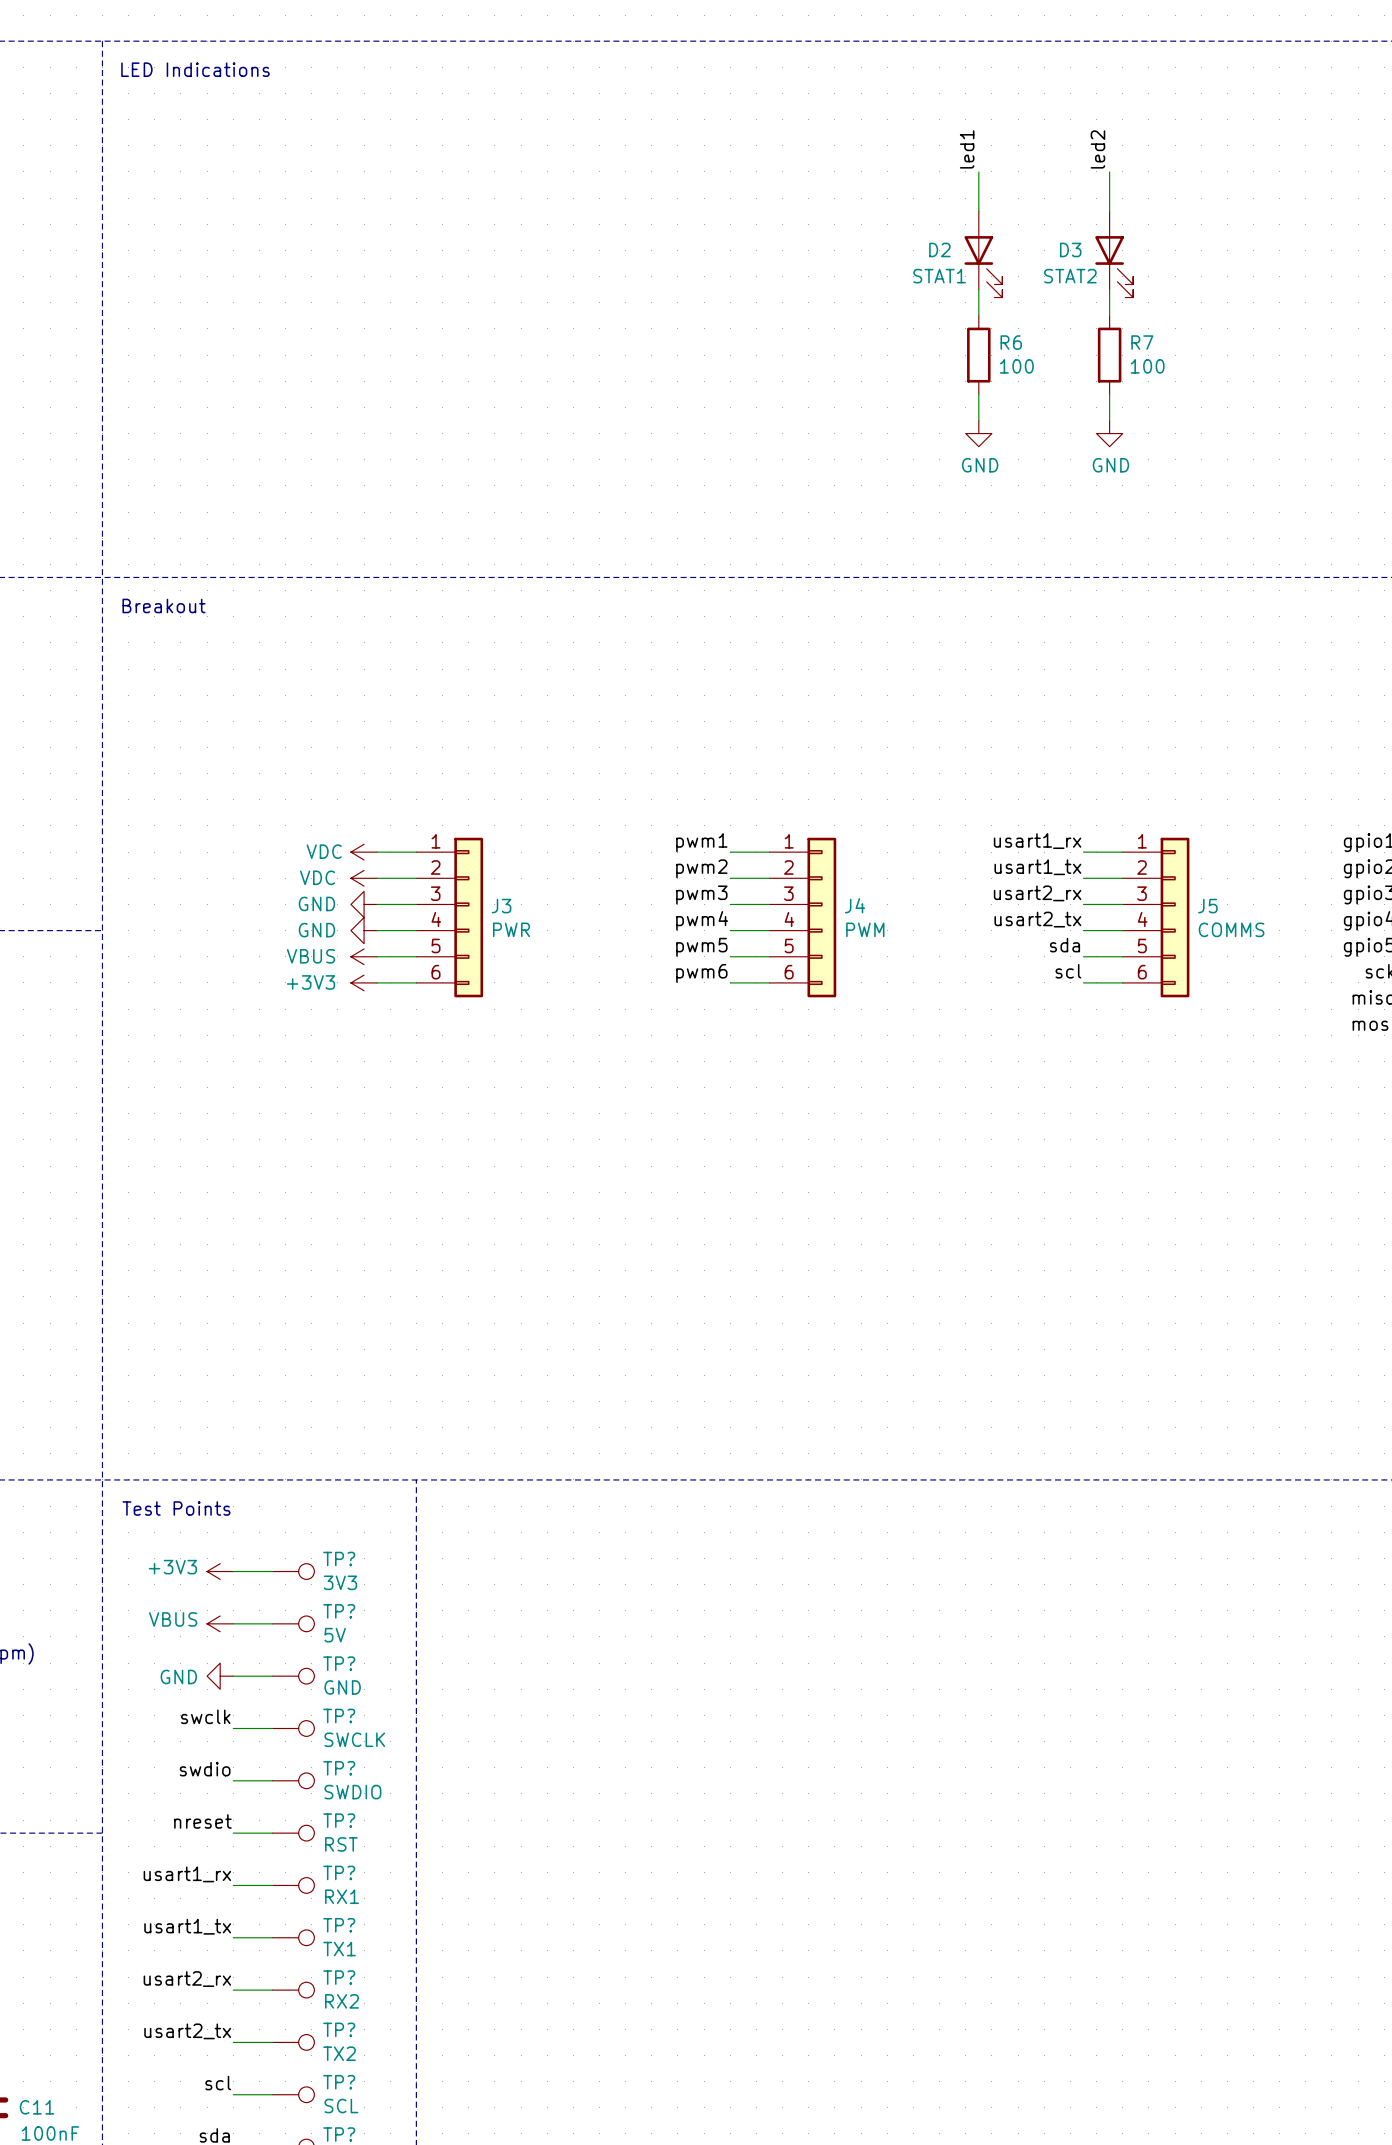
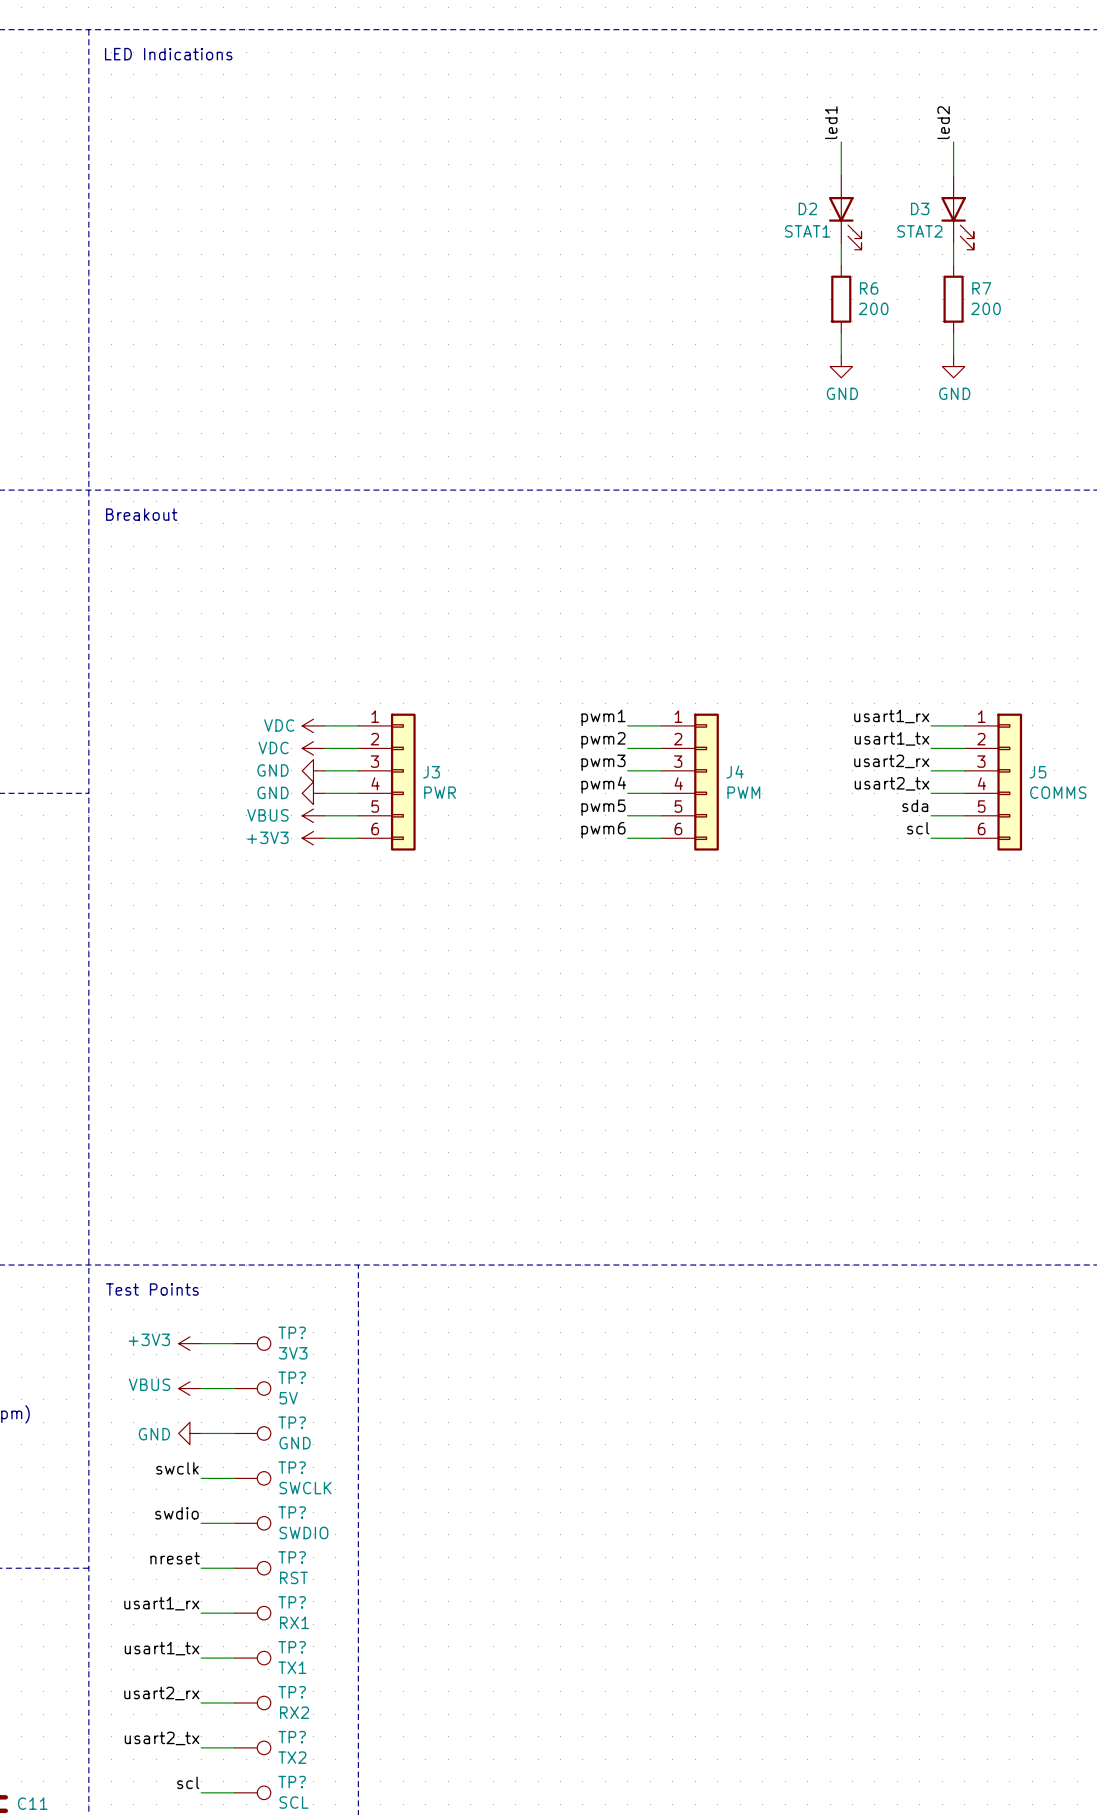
R6 value: 100 (1016, 366) -> 200 (873, 308)
R7 value: 100 (1147, 366) -> 200 (985, 308)

